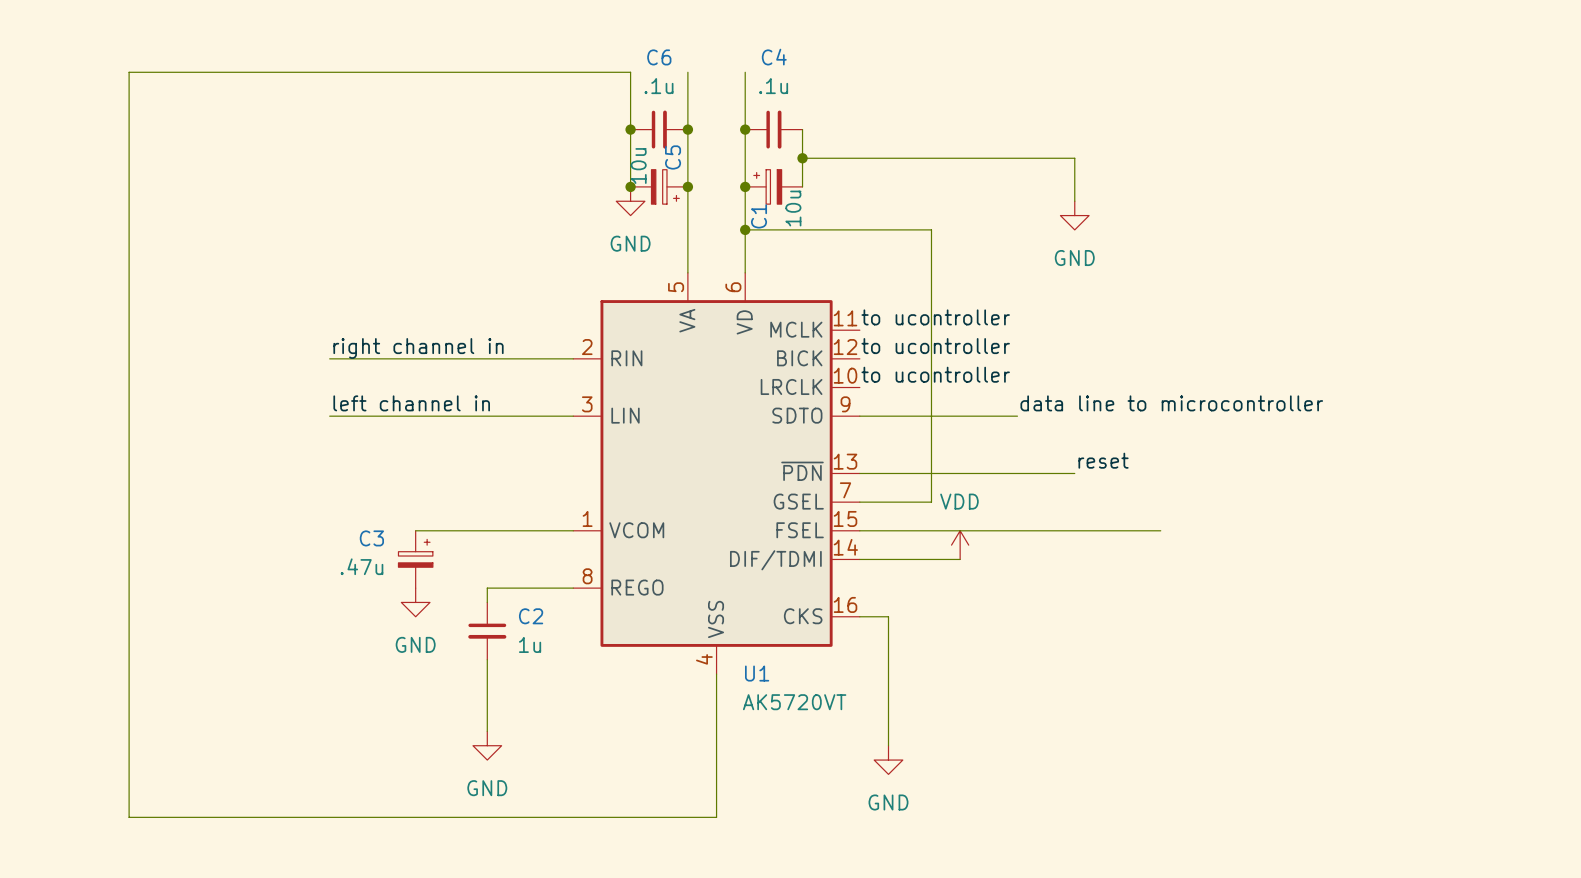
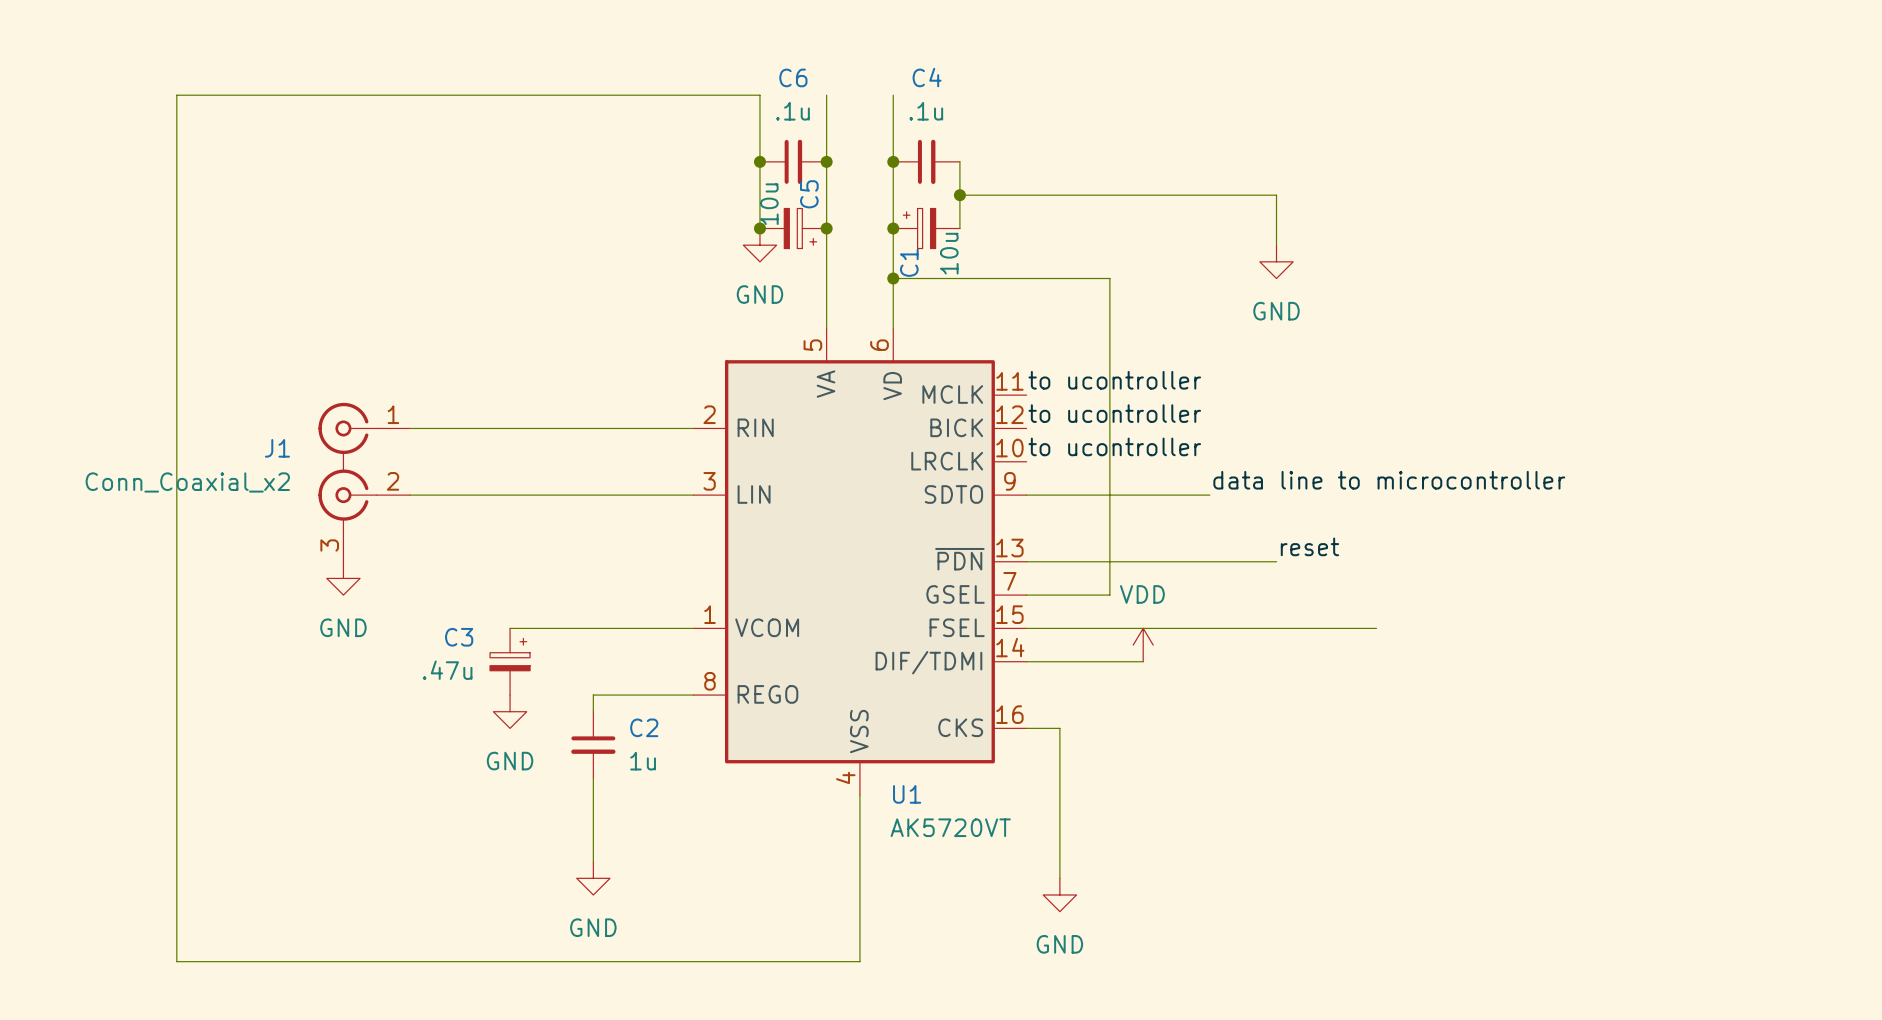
label: right channel in (418, 348) -> none
label: left channel in (411, 403) -> none
J1: none -> Conn_Coaxial_x2 (364, 482)
power symbol: none -> GND (343, 578)

